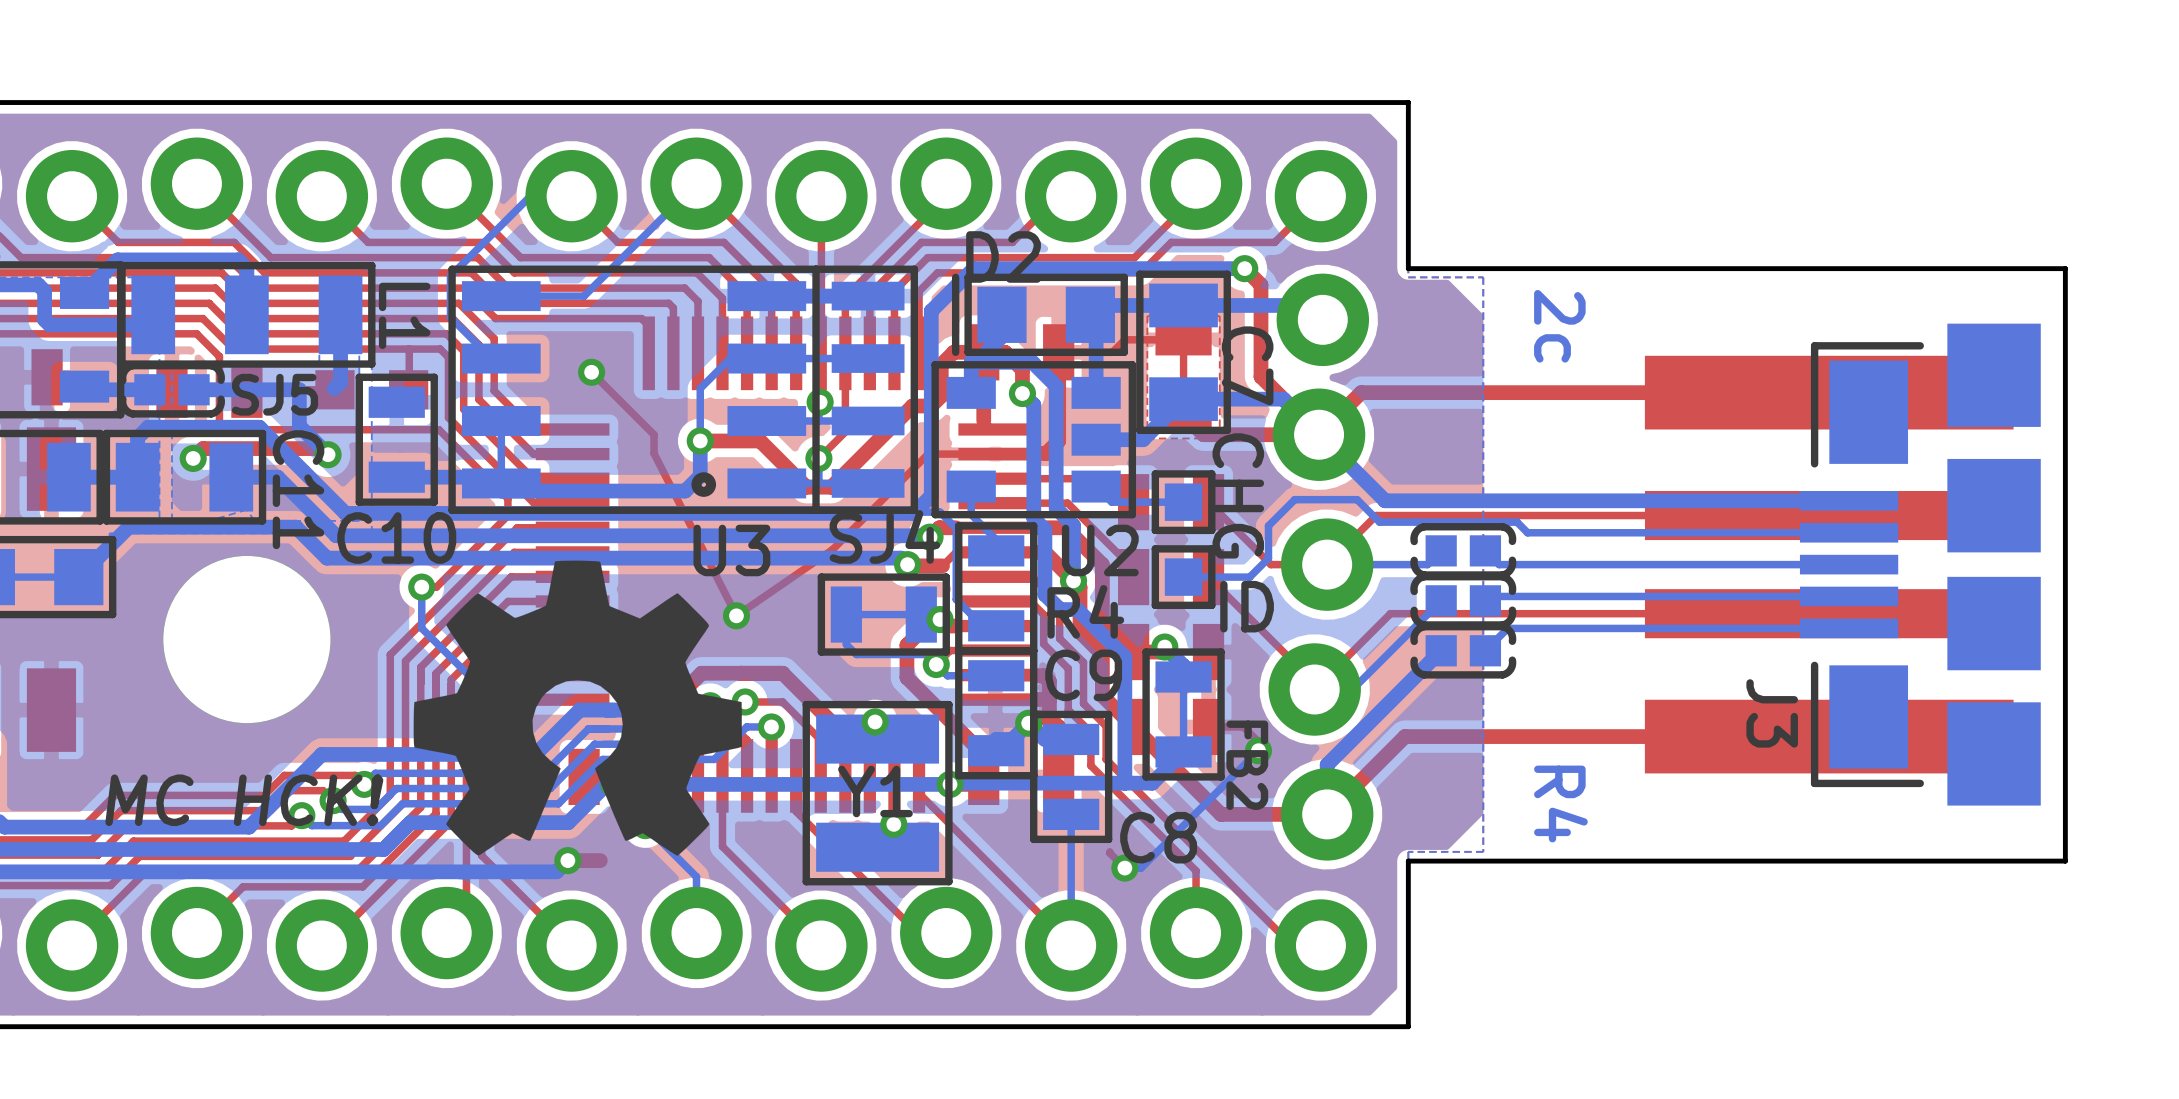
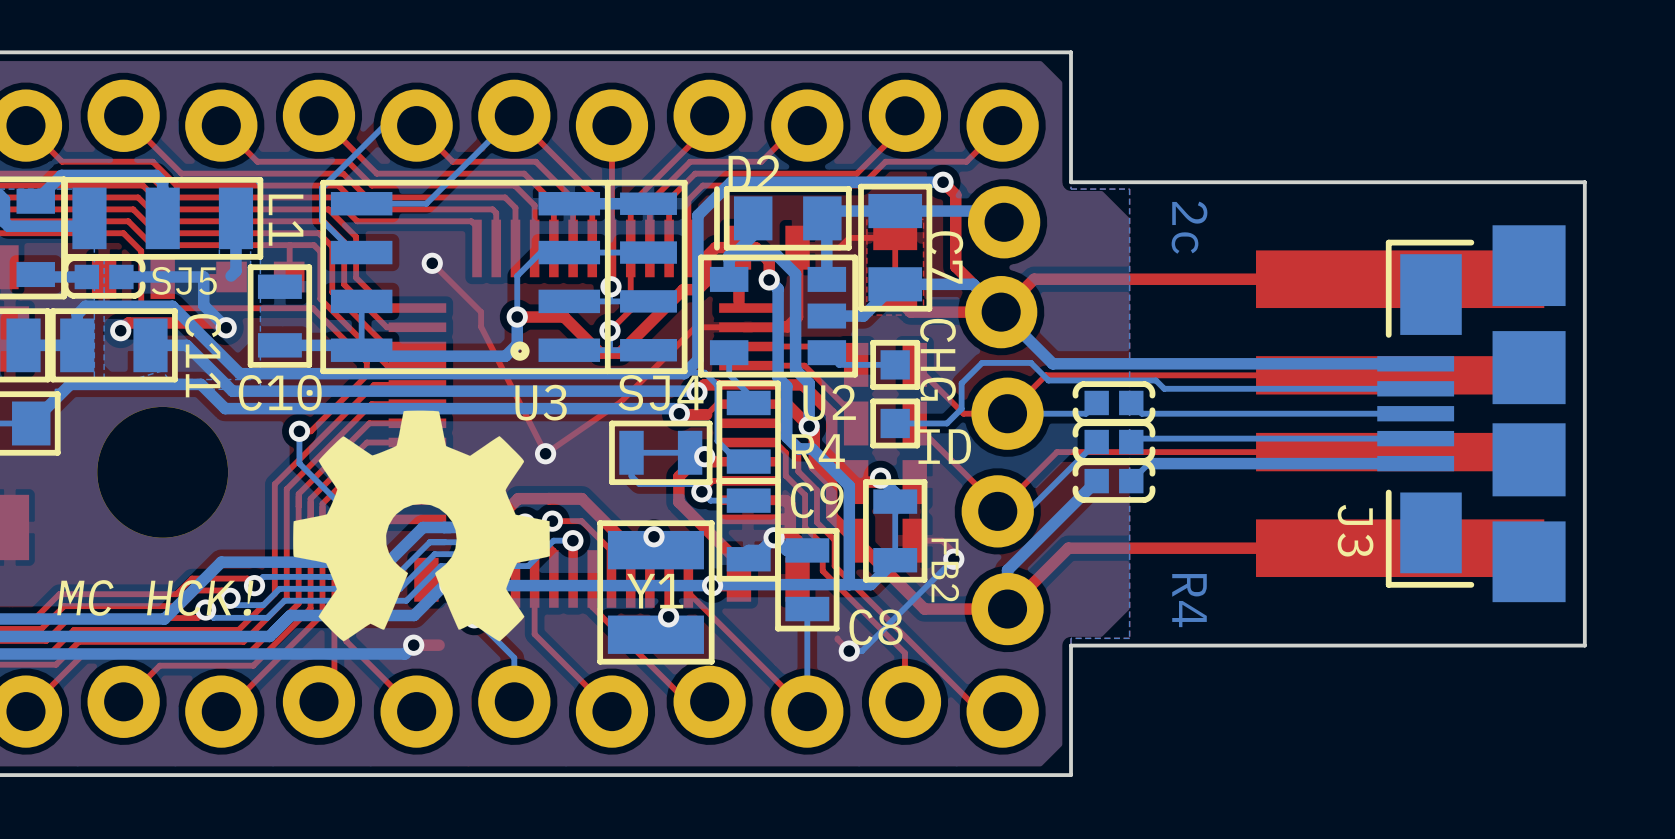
bottom track width: thin (1849, 628) (1510, 628) -> thick (1415, 463) (1151, 463)

